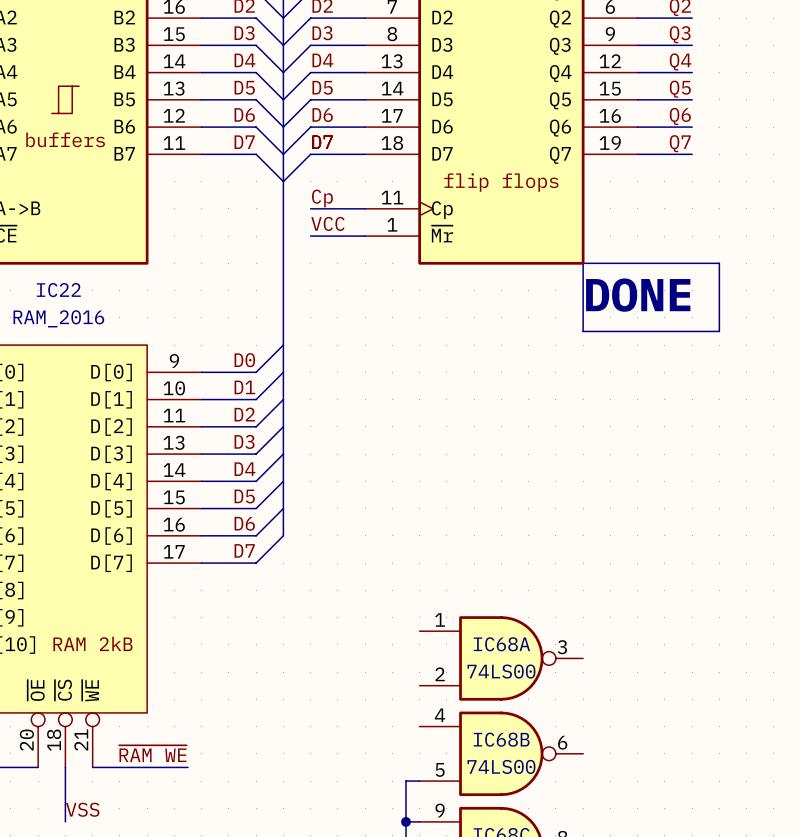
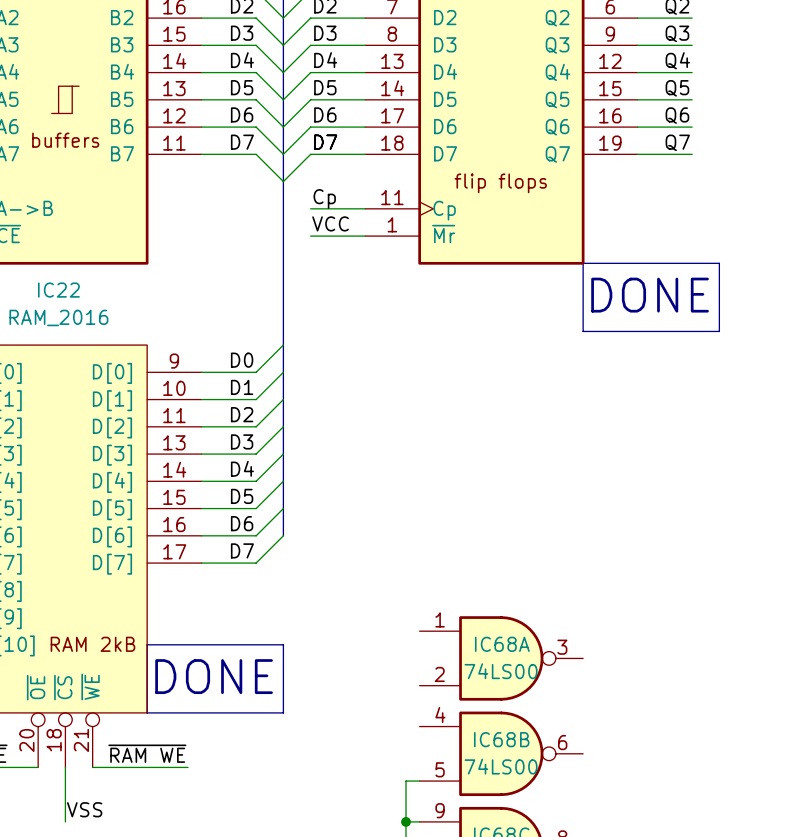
line: none -> (147, 644) (283, 644) (283, 712) (147, 712) (147, 644)
text: none -> DONE (214, 676)

